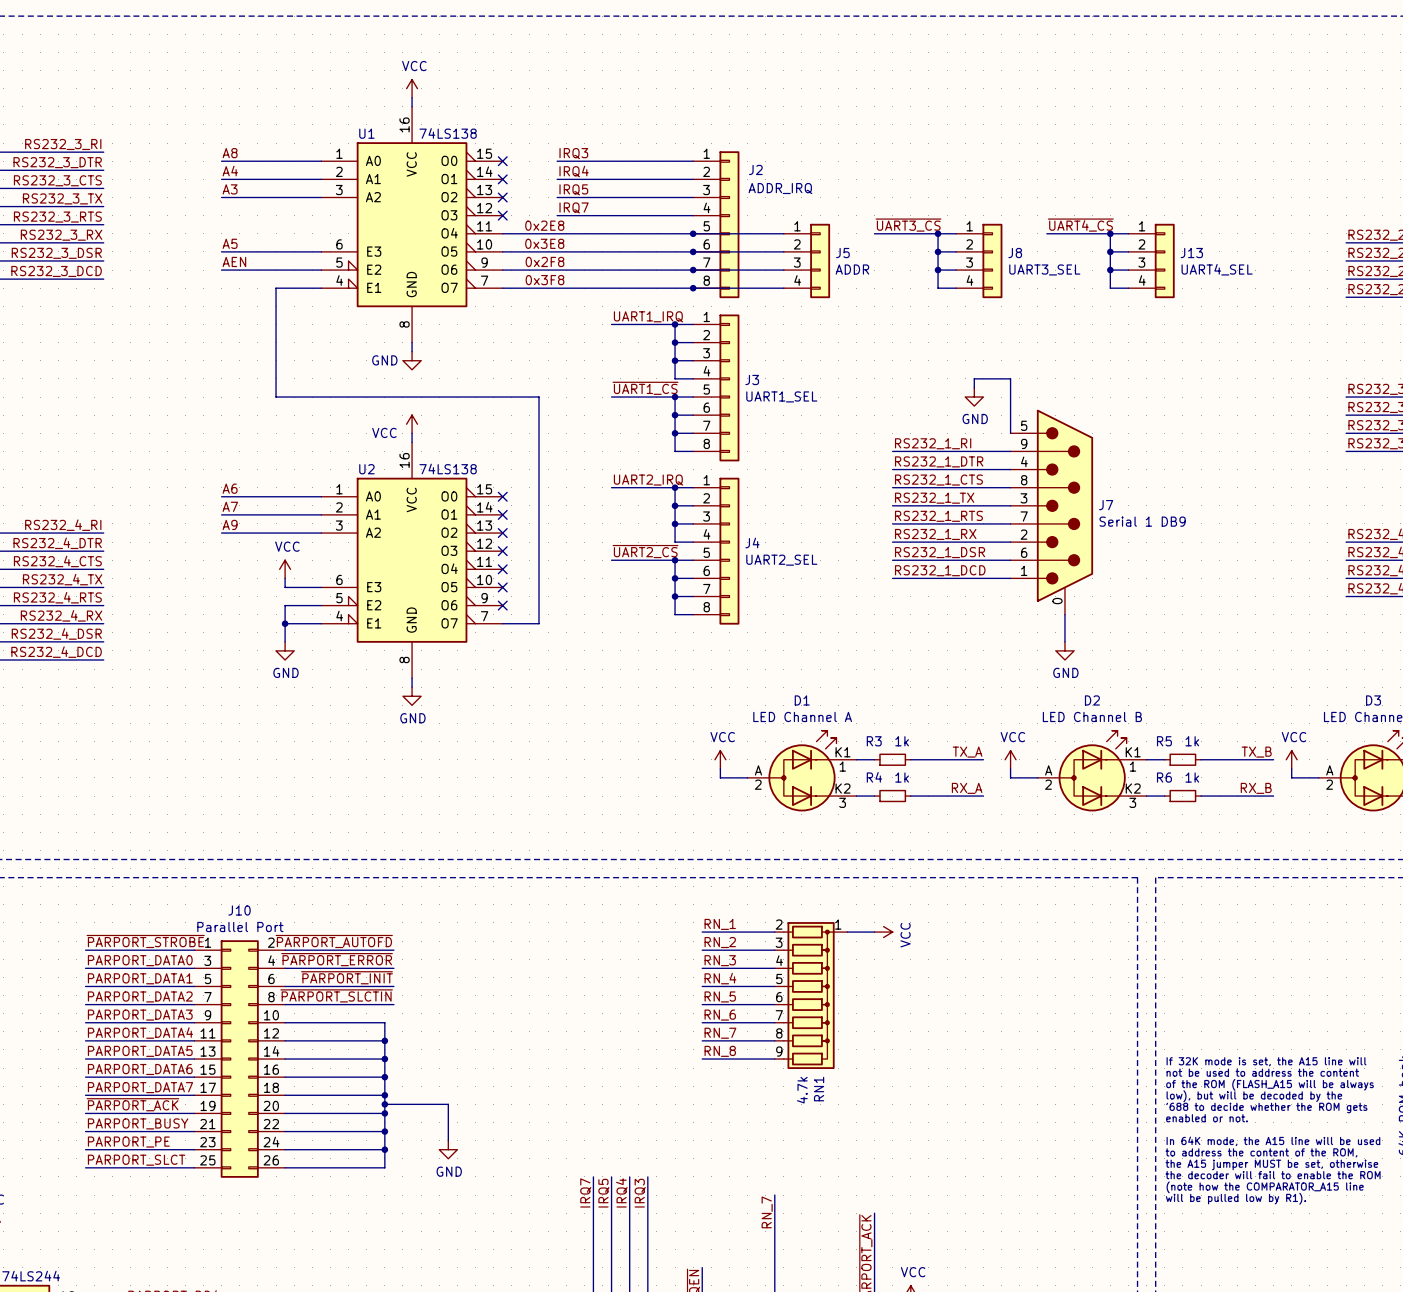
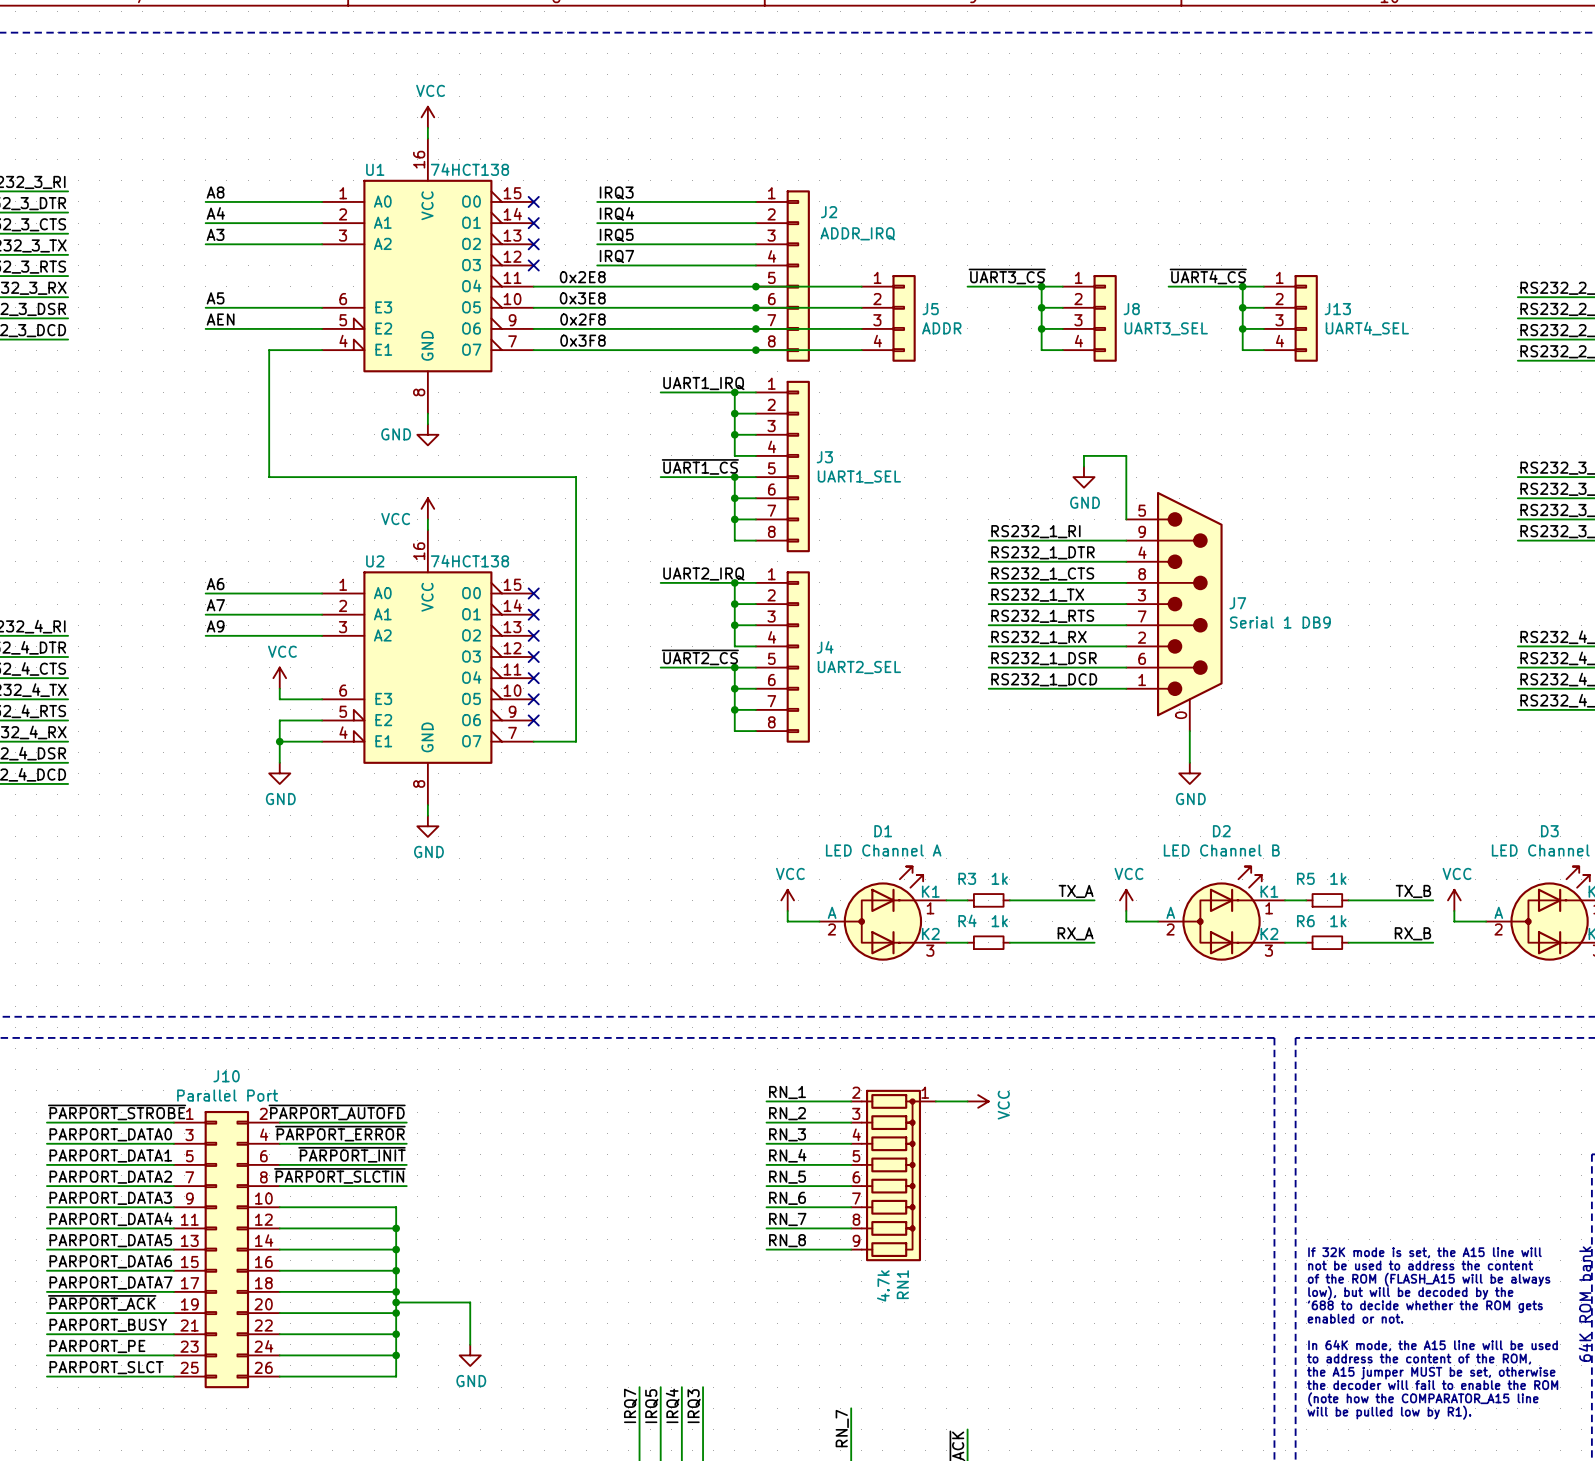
U1 value: 74LS138 (448, 133) -> 74HCT138 (469, 169)
U2 value: 74LS138 (448, 469) -> 74HCT138 (469, 561)

